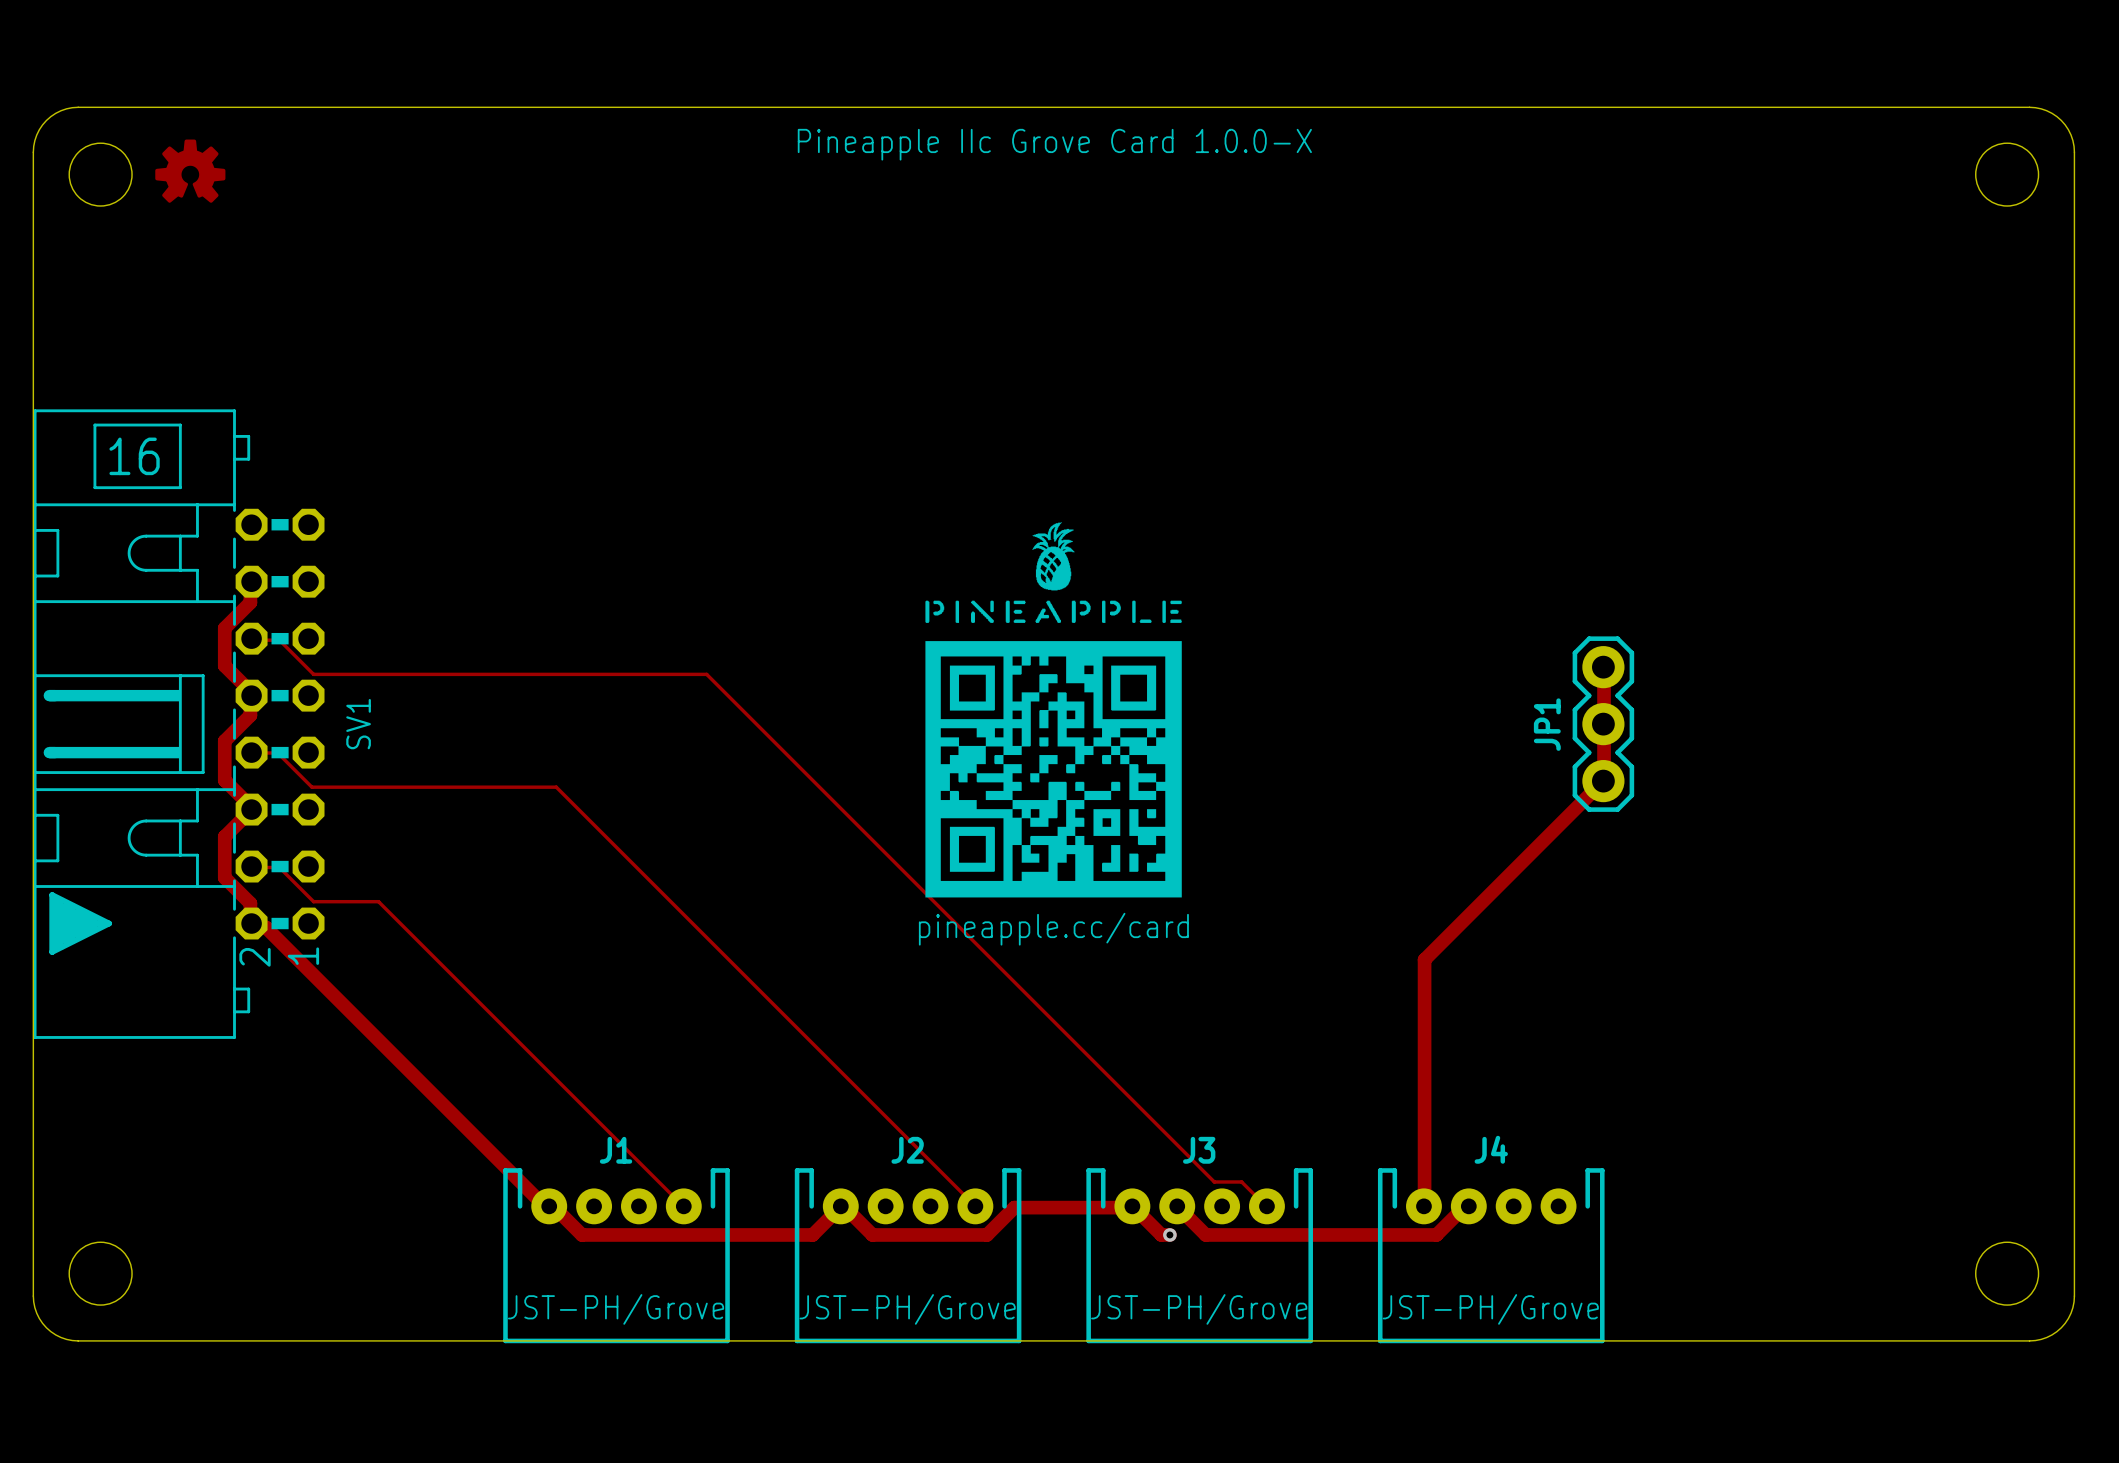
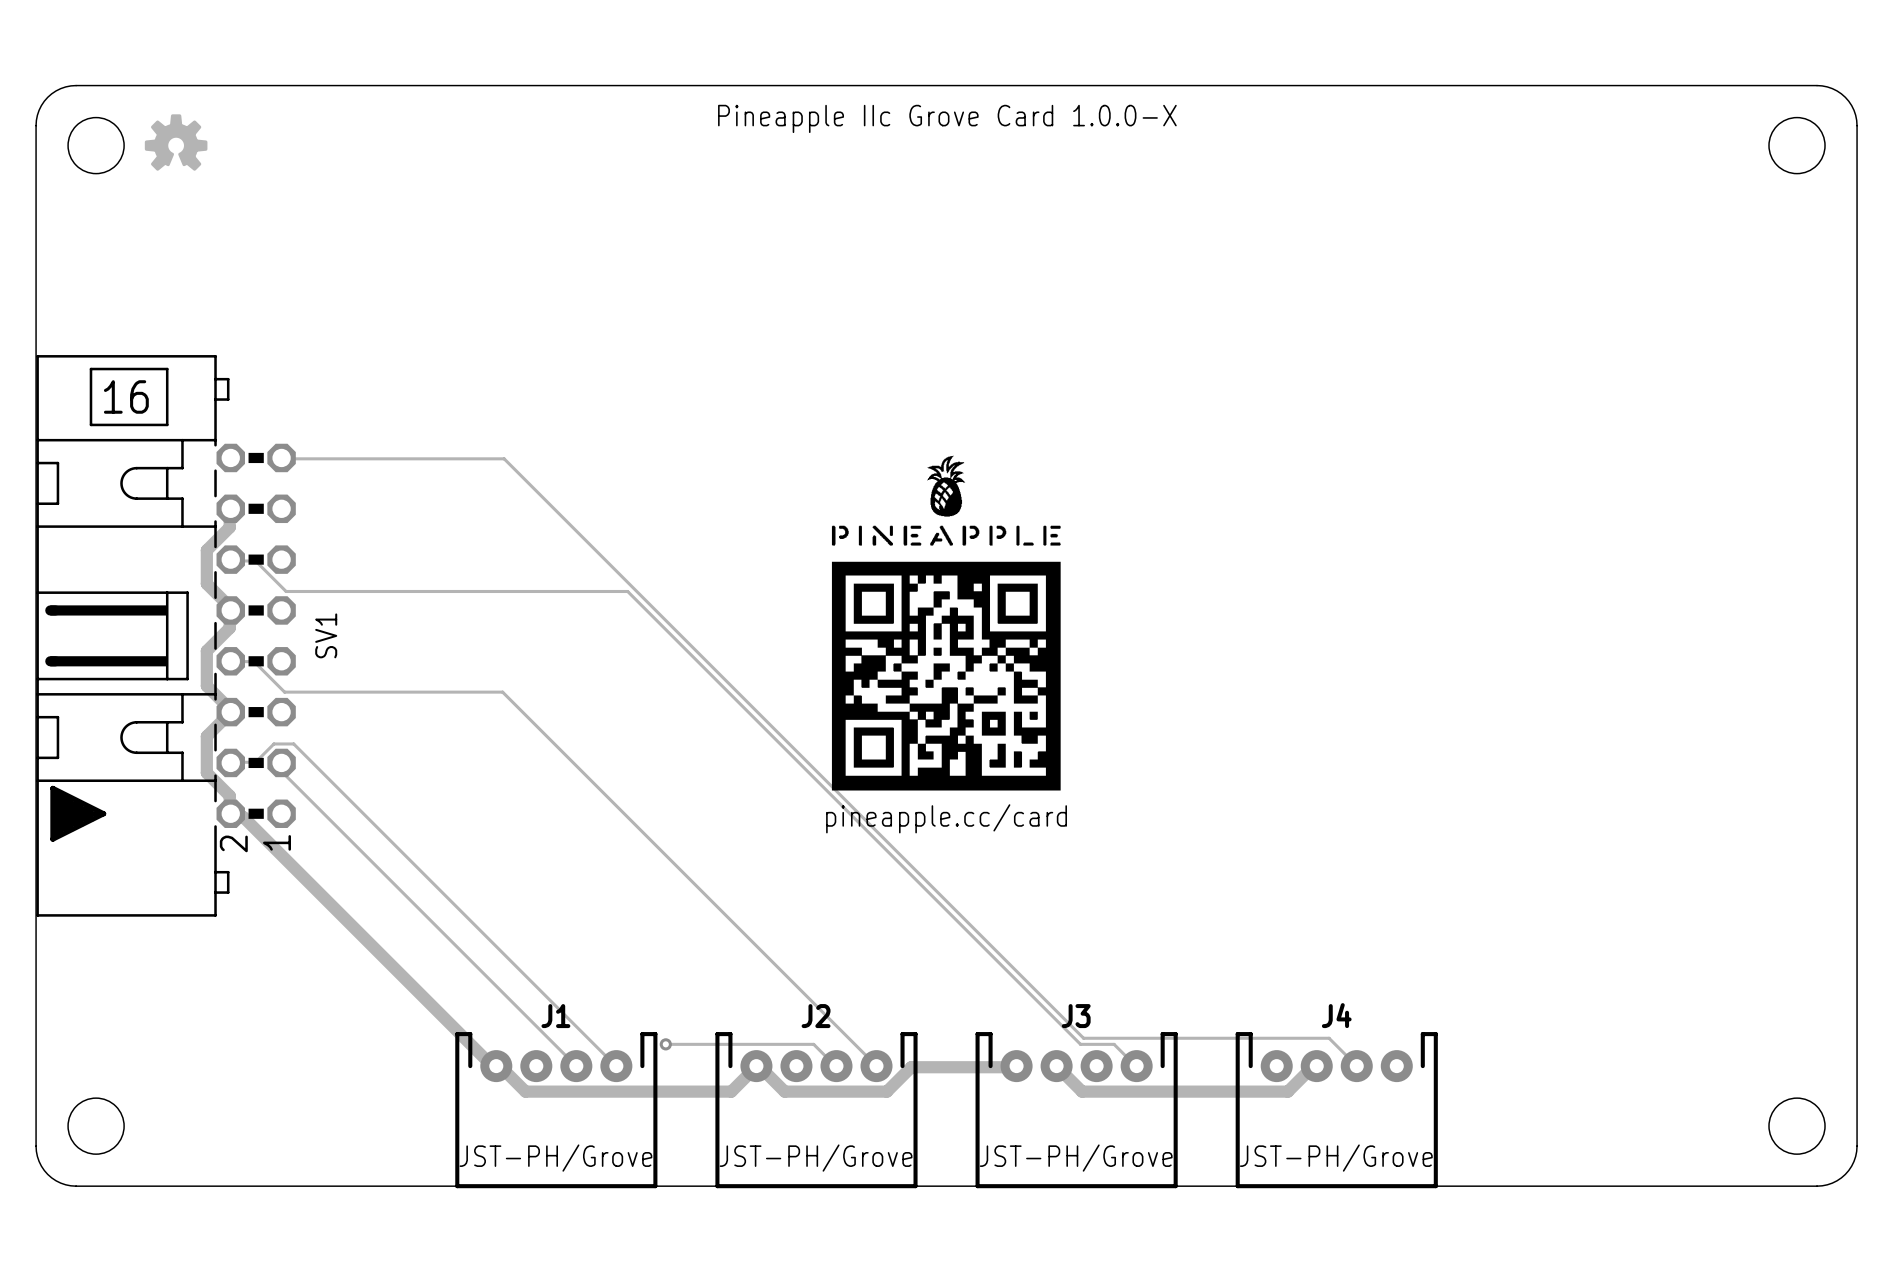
track: (1603, 667) (1603, 781) (1424, 959) (1423, 1206) -> none
track: (696, 674) (706, 674) -> (281, 457) (504, 458) (636, 591)
track: none -> (627, 591) (1080, 1044) (1089, 1044)
JP1: (1603, 724) -> none
track: (251, 866) (279, 867) (313, 901) (378, 901) -> (230, 762) (255, 762) (273, 743) (293, 743) (344, 794)
track: none -> (281, 762) (283, 772) (576, 1066)
track: (1207, 1175) (1214, 1181) -> (1083, 1038) (1329, 1038) (1356, 1066)
track: none -> (665, 1044) (813, 1044) (836, 1066)
via: none -> (665, 1044)
track: (1132, 1206) (1161, 1234) (1169, 1234) -> none
via: (1169, 1234) -> none

